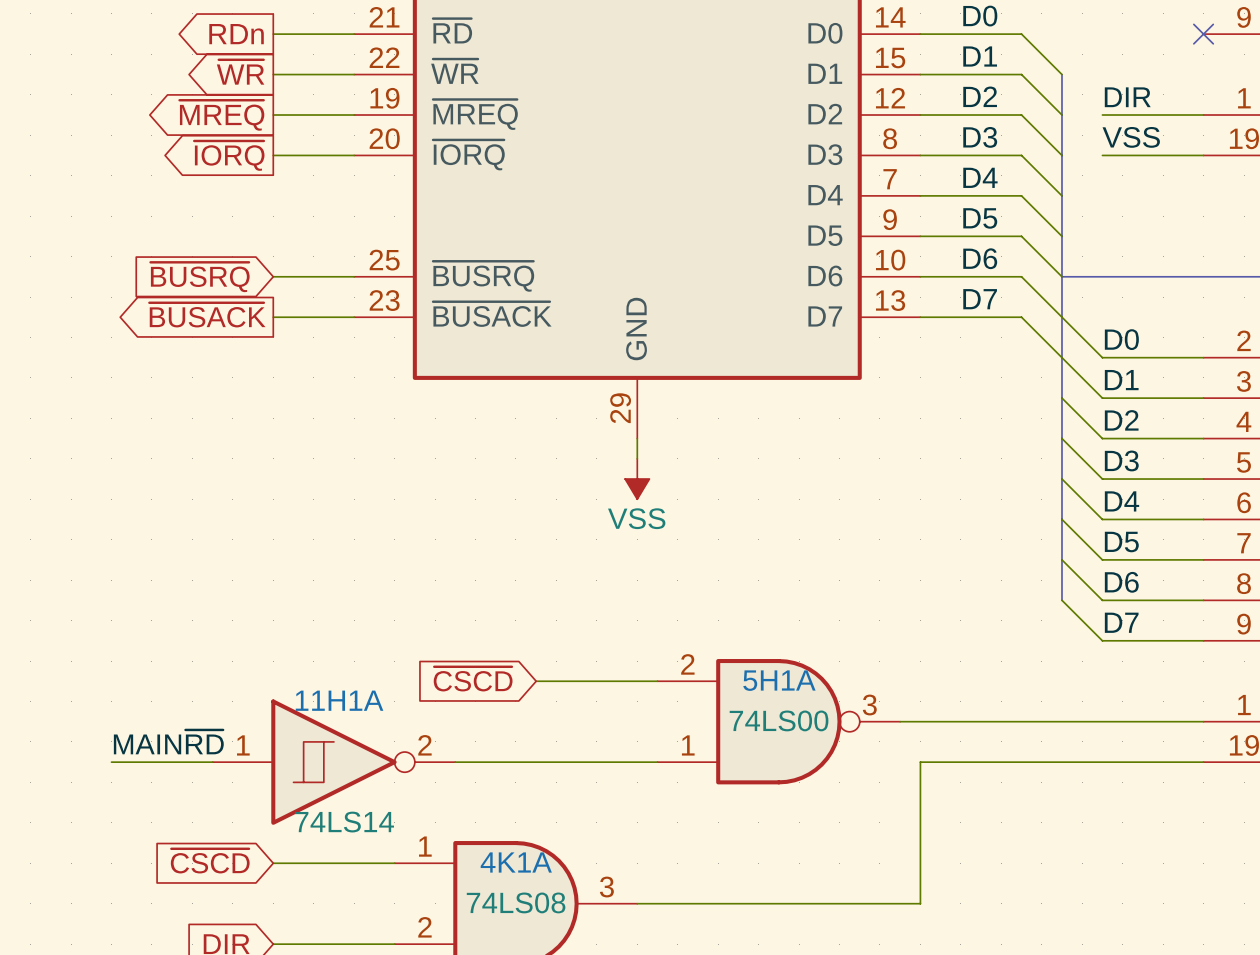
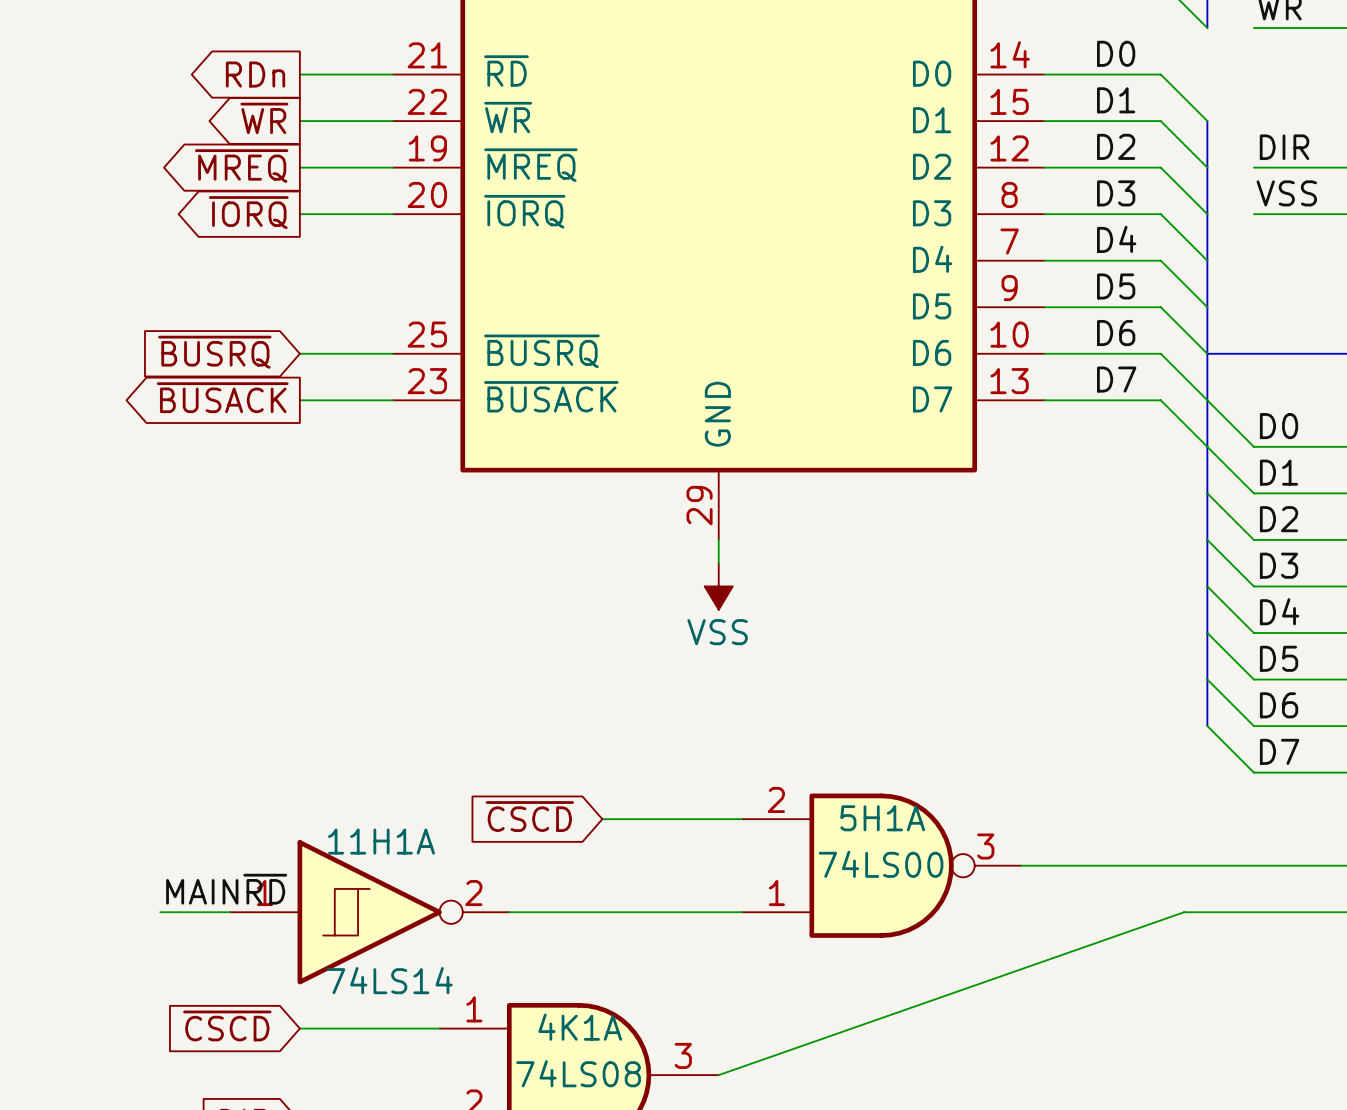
label position: MAIN~{RD} (168, 742) -> MAIN~{RD} (226, 889)
wire: (111, 762) (151, 762) -> none
wire: (1041, 762) (920, 762) (920, 903) (637, 903) -> (1184, 912) (718, 1075)

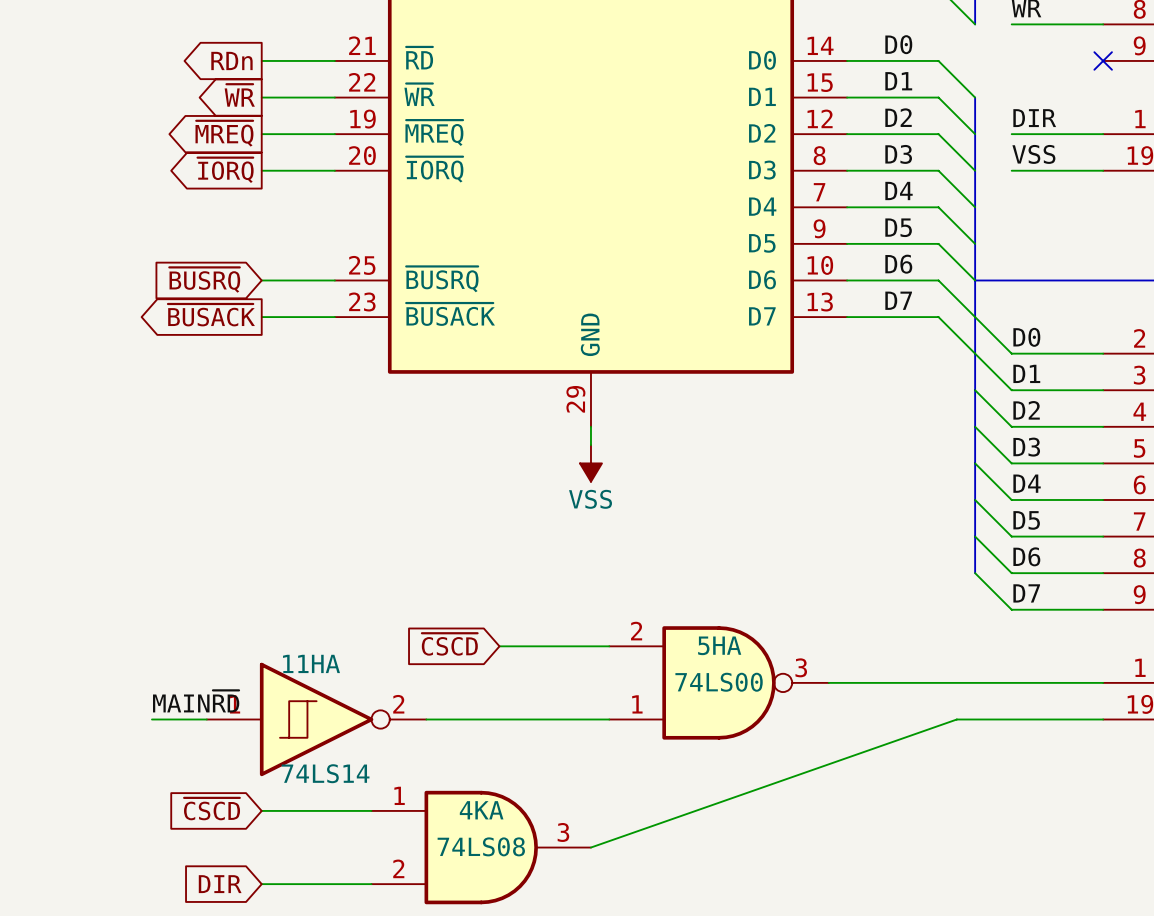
5H1A name: 5H1A (882, 818) -> 5HA (719, 645)
11H1A name: 11H1A (381, 841) -> 11HA (311, 663)
4K1A name: 4K1A (580, 1027) -> 4KA (481, 810)

